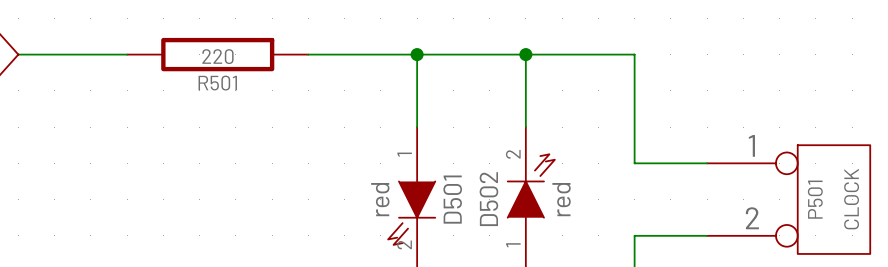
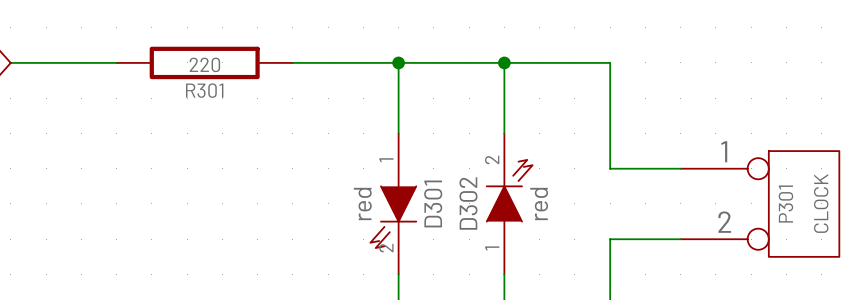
R501 name: R501 (217, 83) -> R301 (204, 90)
D501 name: D501 (452, 199) -> D301 (433, 203)
D502 name: D502 (488, 199) -> D302 (468, 203)
P501 name: P501 (815, 199) -> P301 (785, 204)

